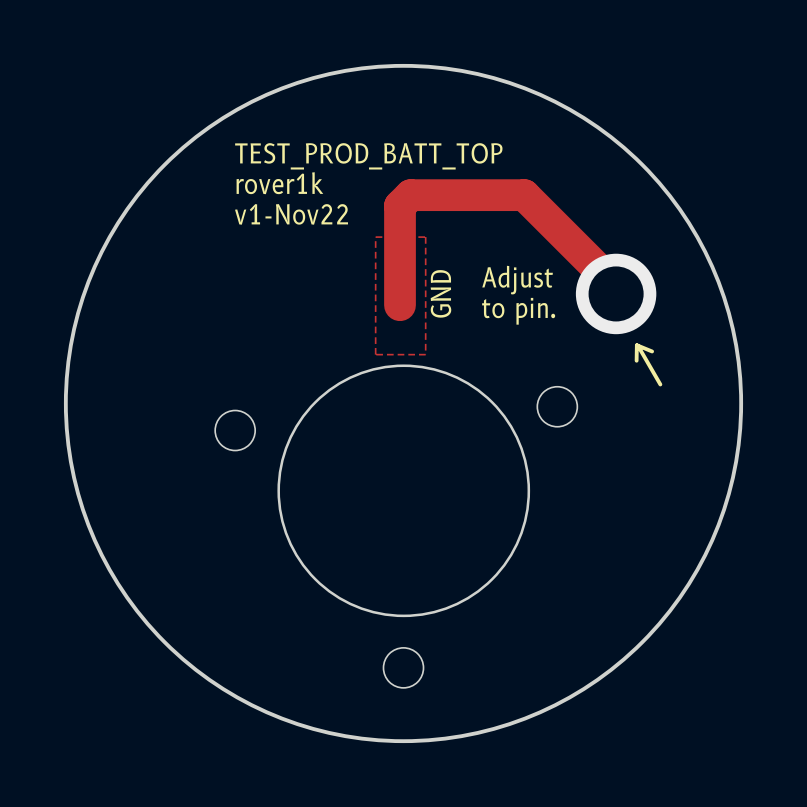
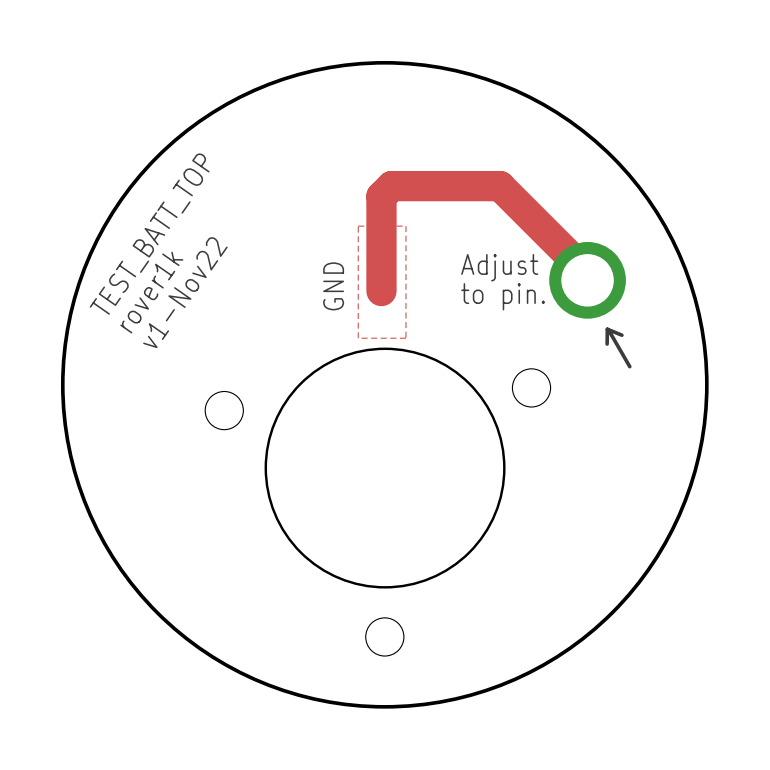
text: TEST_PROD_BATT_TOP (368, 156) -> TEST_BATT_TOP (149, 234)
text rotation: 0° (279, 183) -> 55° counterclockwise (151, 292)
text position: rover1k (279, 183) -> rover1k (151, 292)
text rotation: 0° (291, 214) -> 55° counterclockwise (185, 292)
text position: GND (440, 293) -> GND (333, 286)

